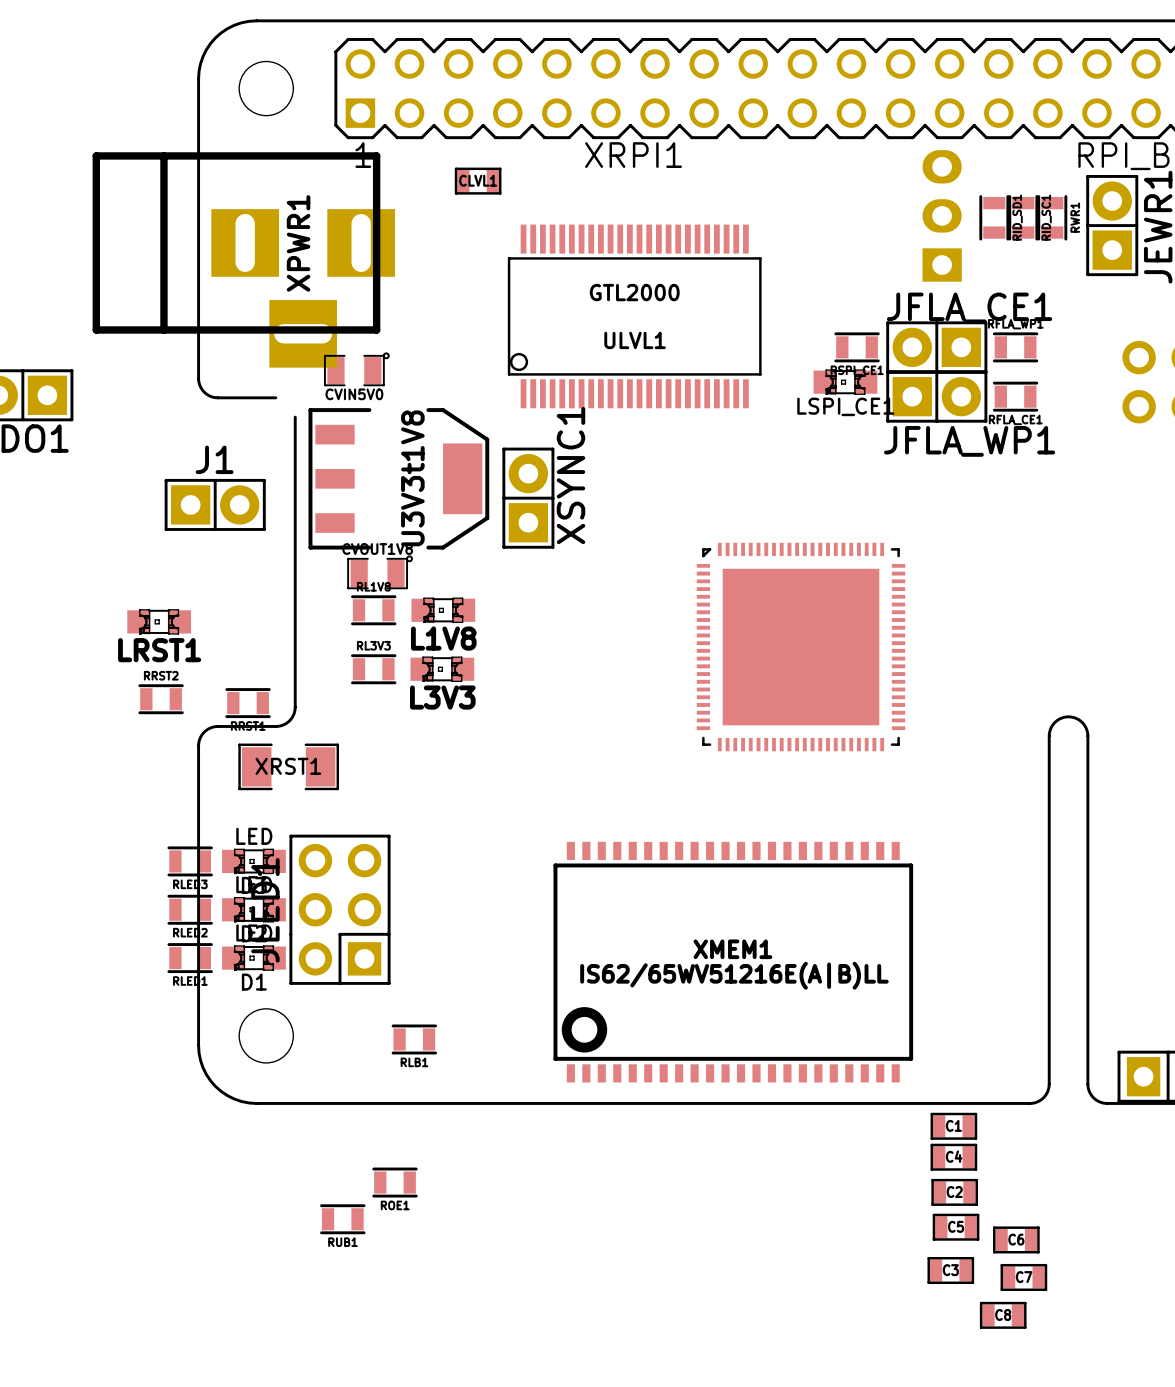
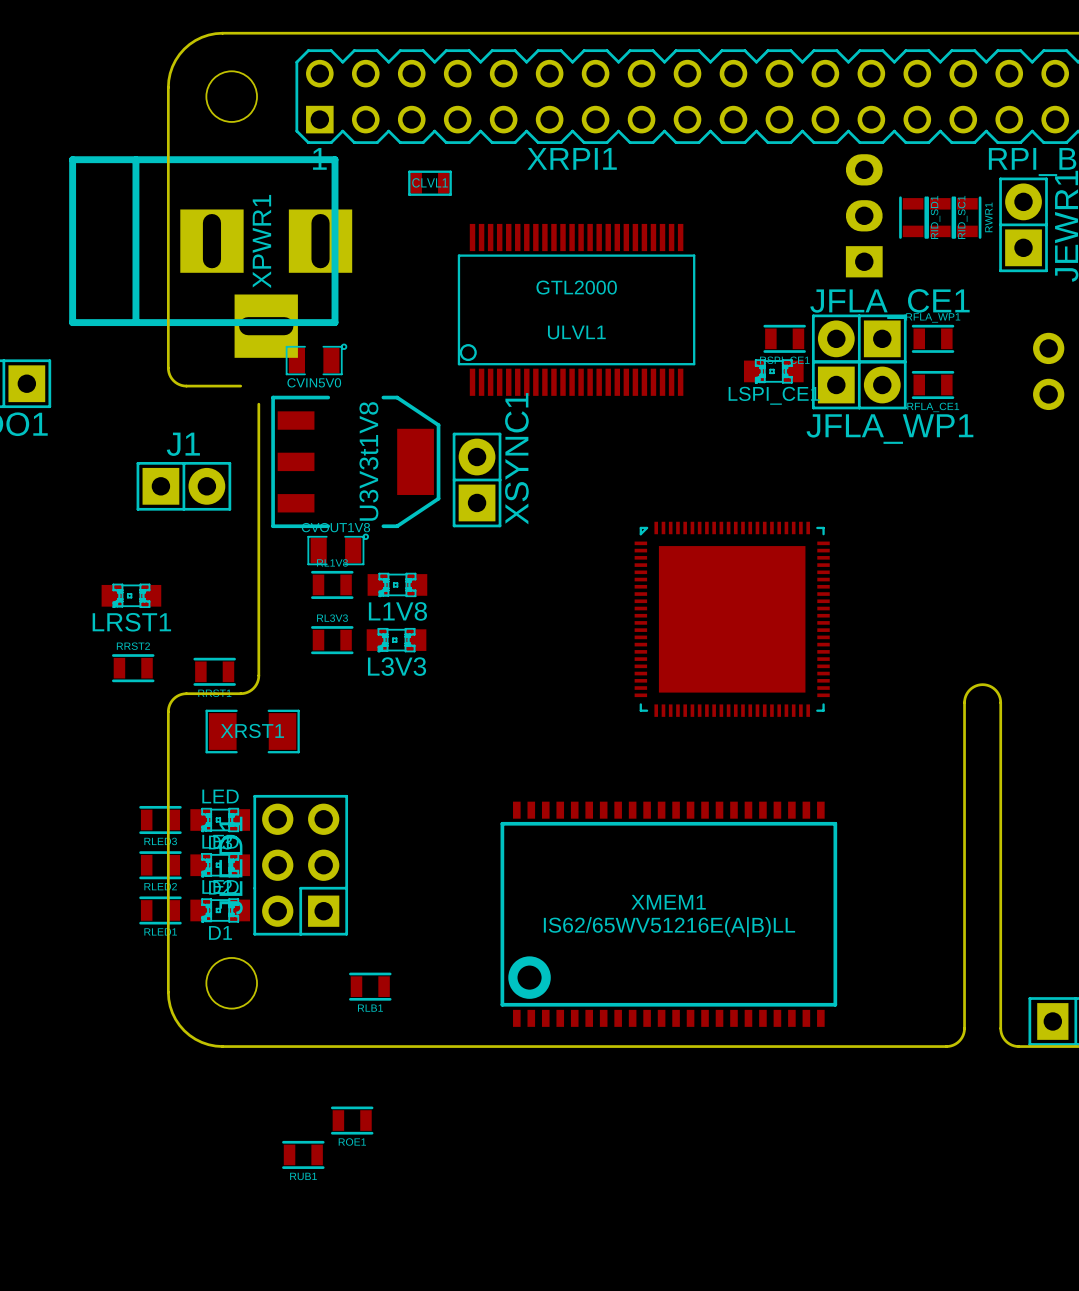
C1: (953, 1126) -> none
C4: (953, 1157) -> none
C2: (954, 1192) -> none
C5: (956, 1227) -> none
C6: (1016, 1239) -> none
C3: (950, 1270) -> none
C7: (1023, 1277) -> none
C8: (1003, 1315) -> none

